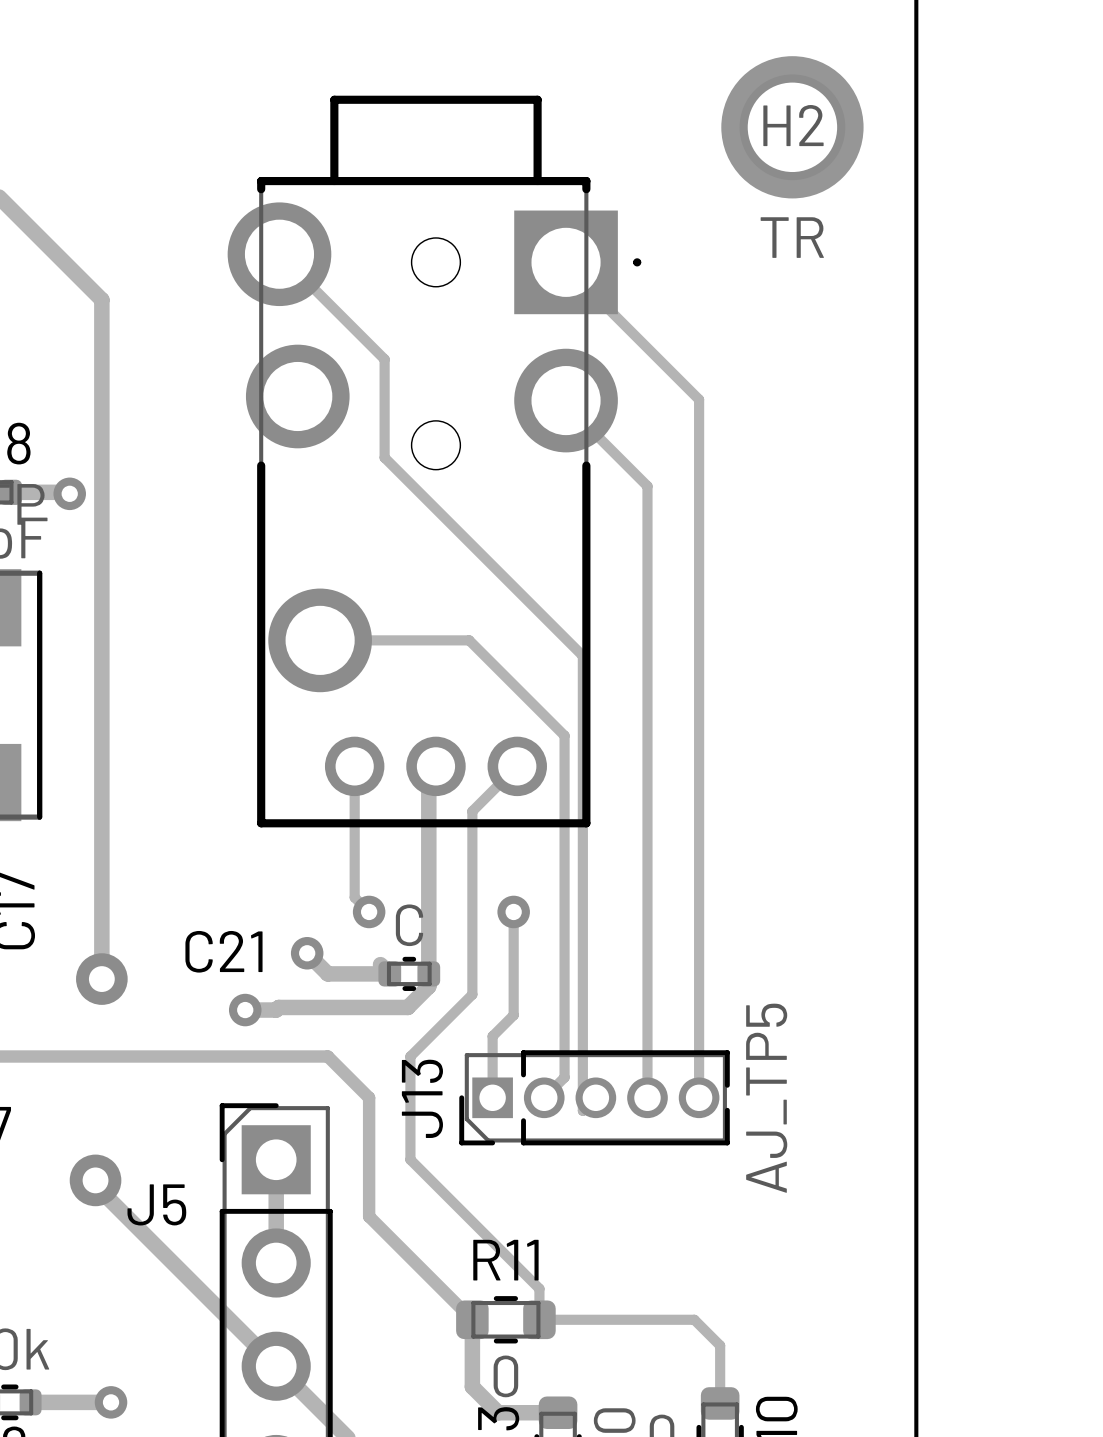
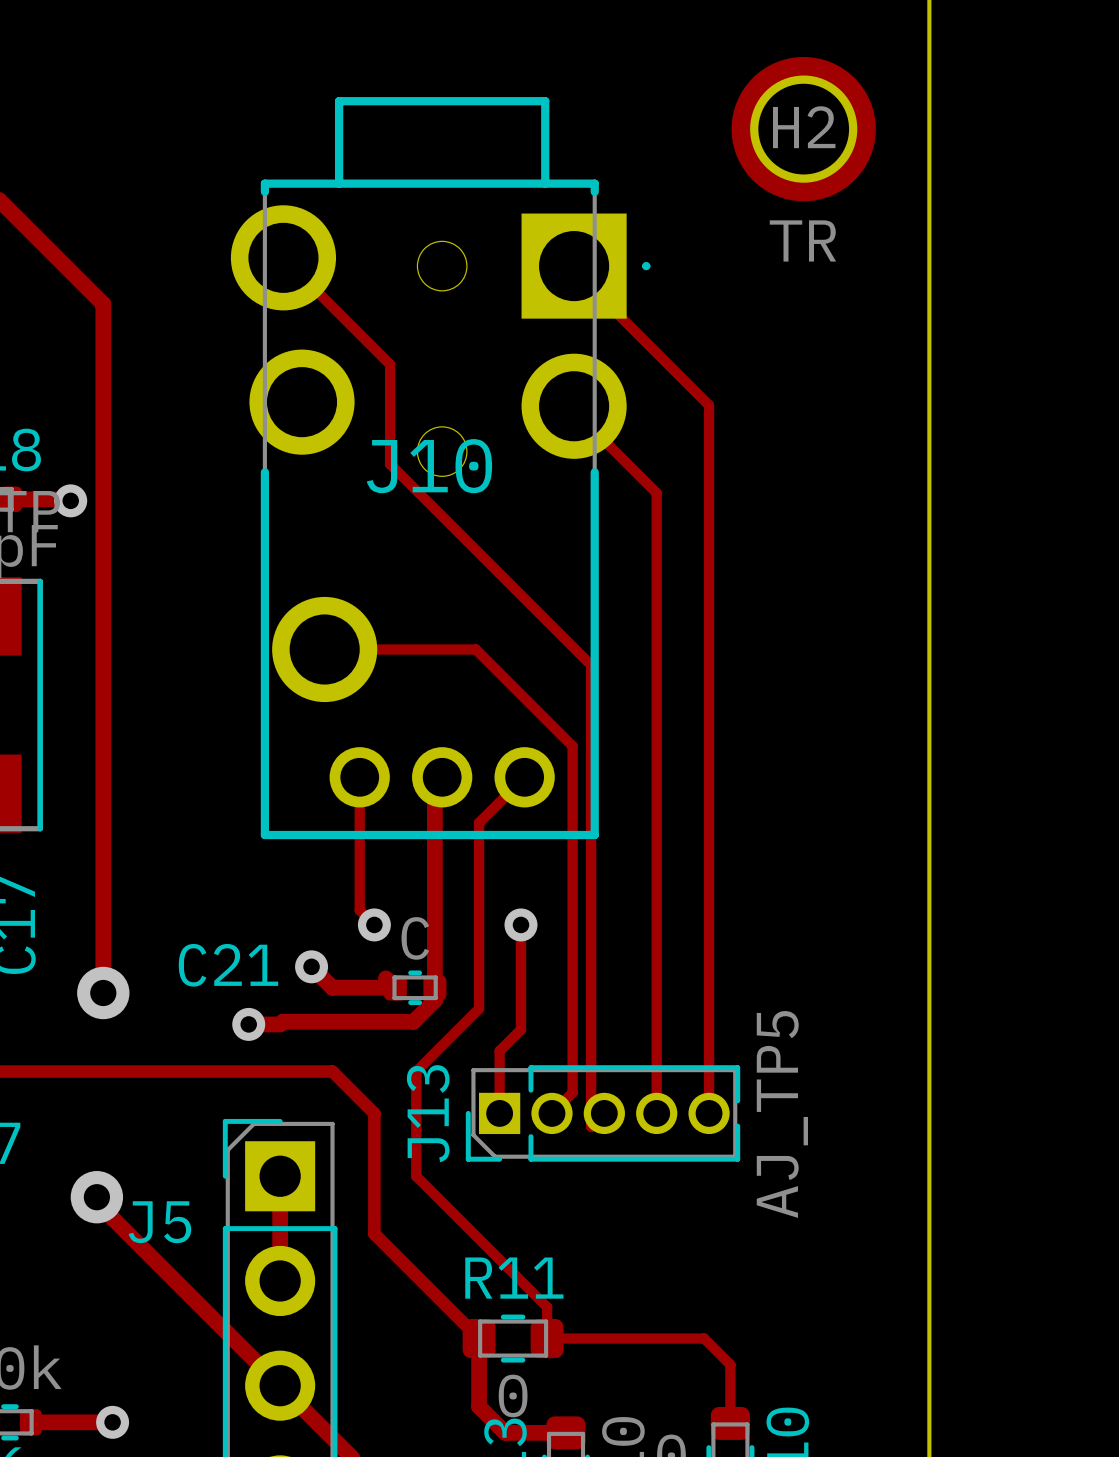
J10 name: none -> J10 (429, 466)

